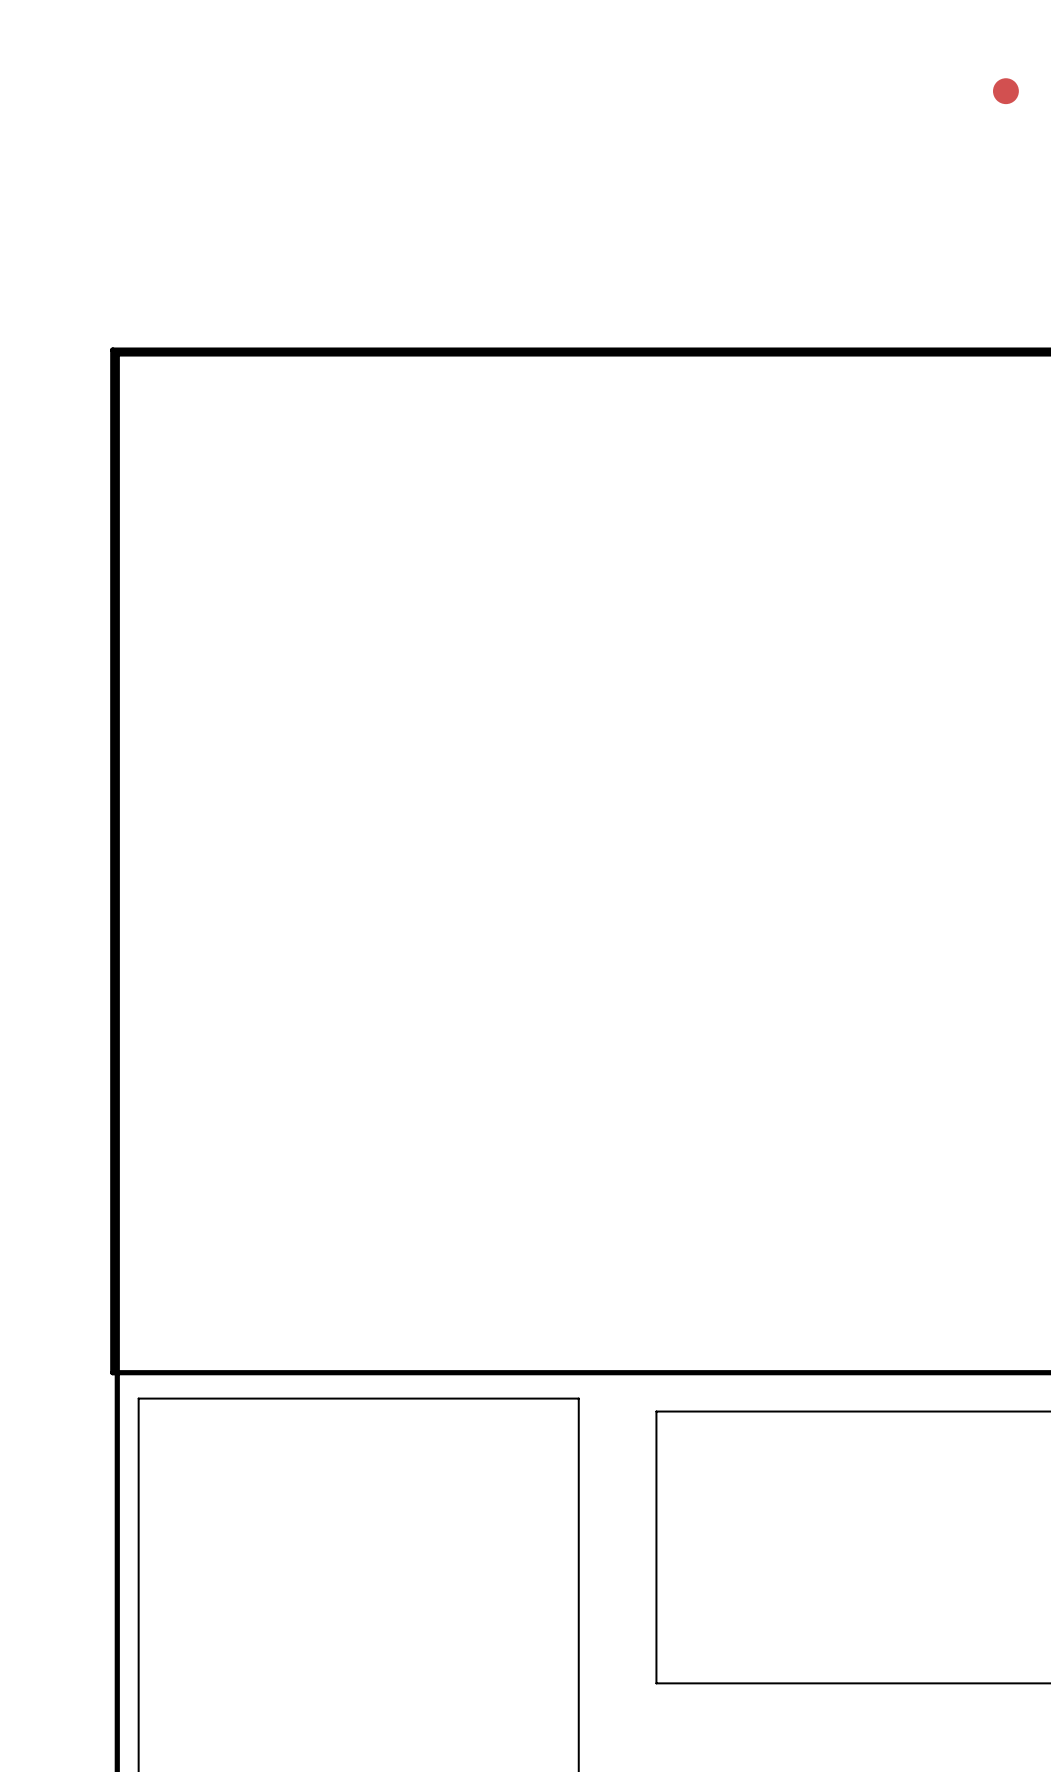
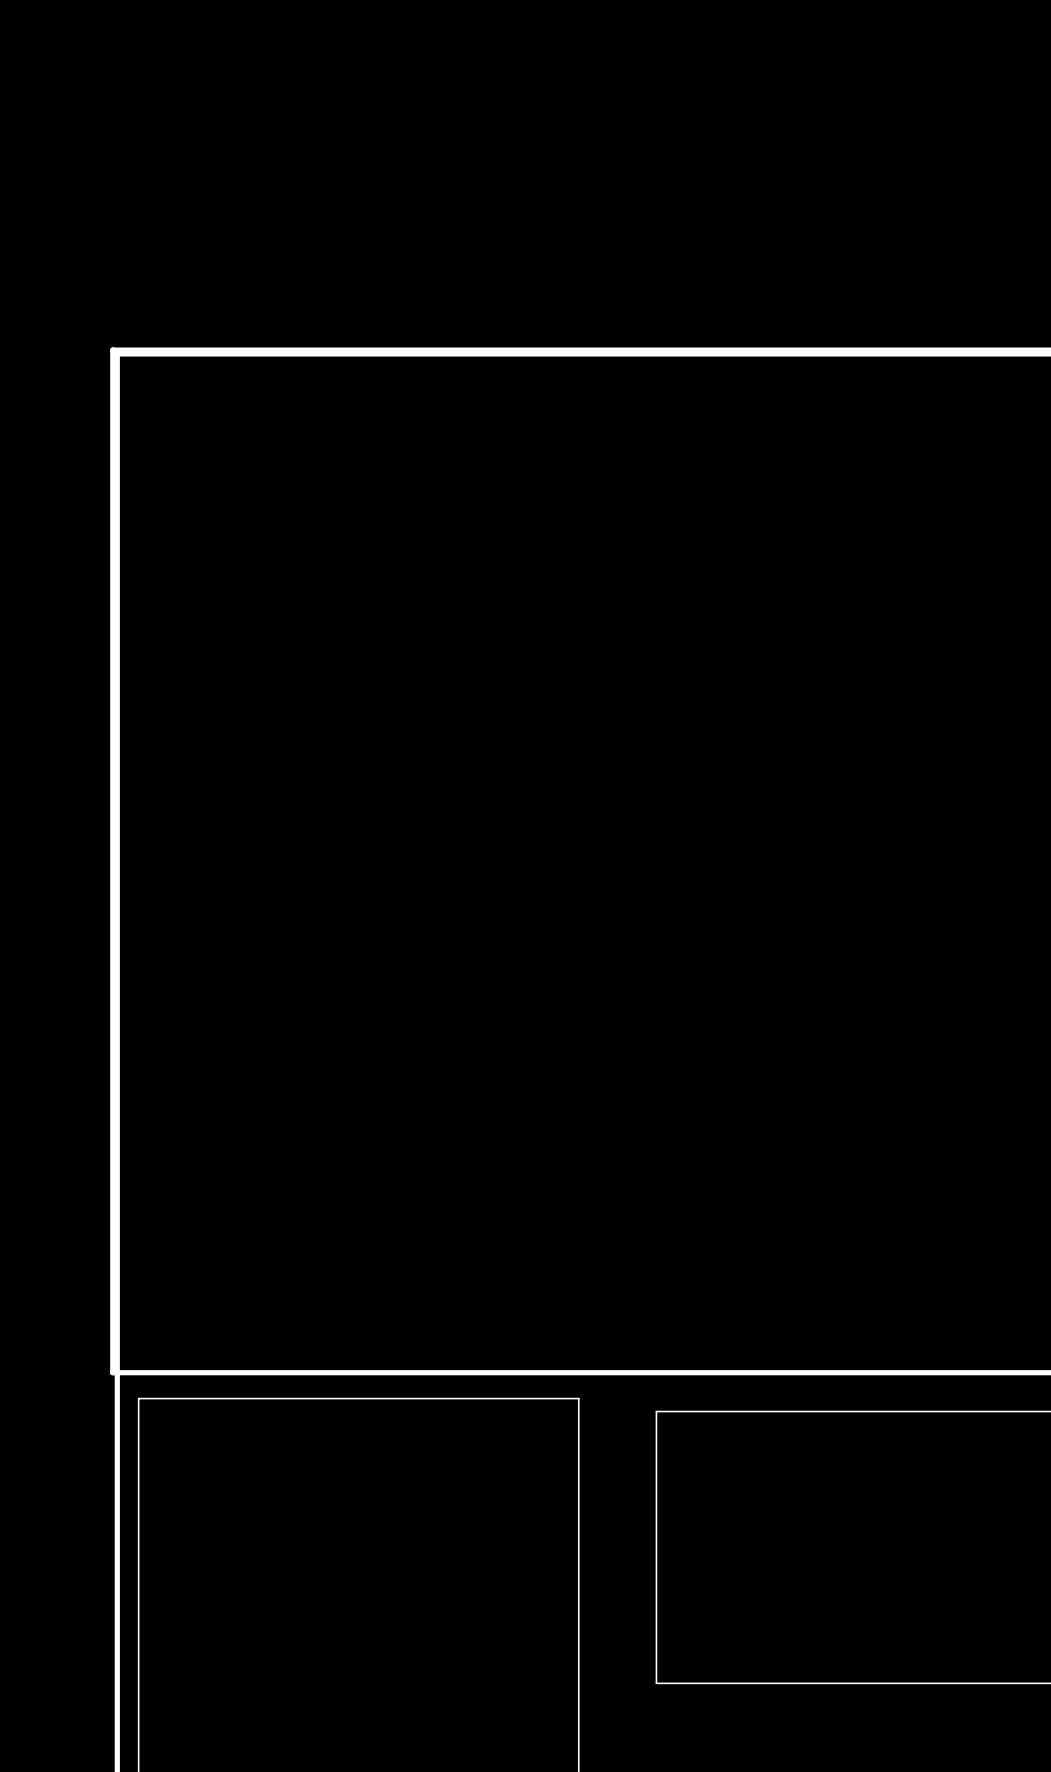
part: (1005, 91) -> none

